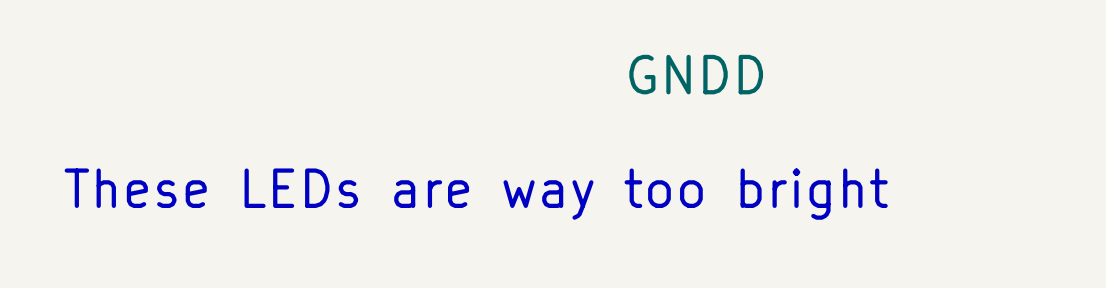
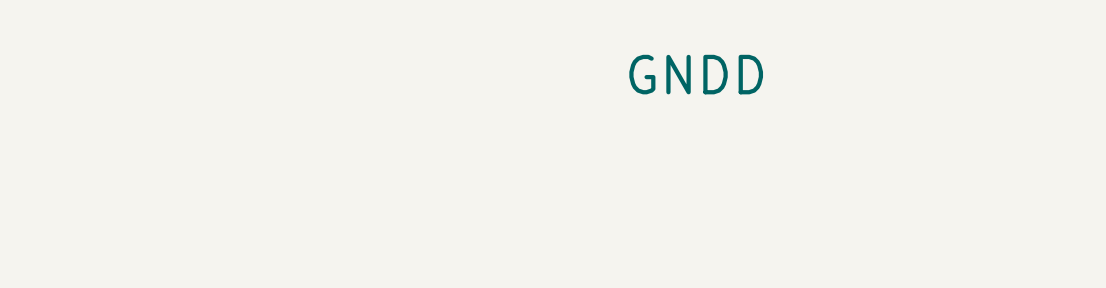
text: These LEDs are way too bright (476, 194) -> none

